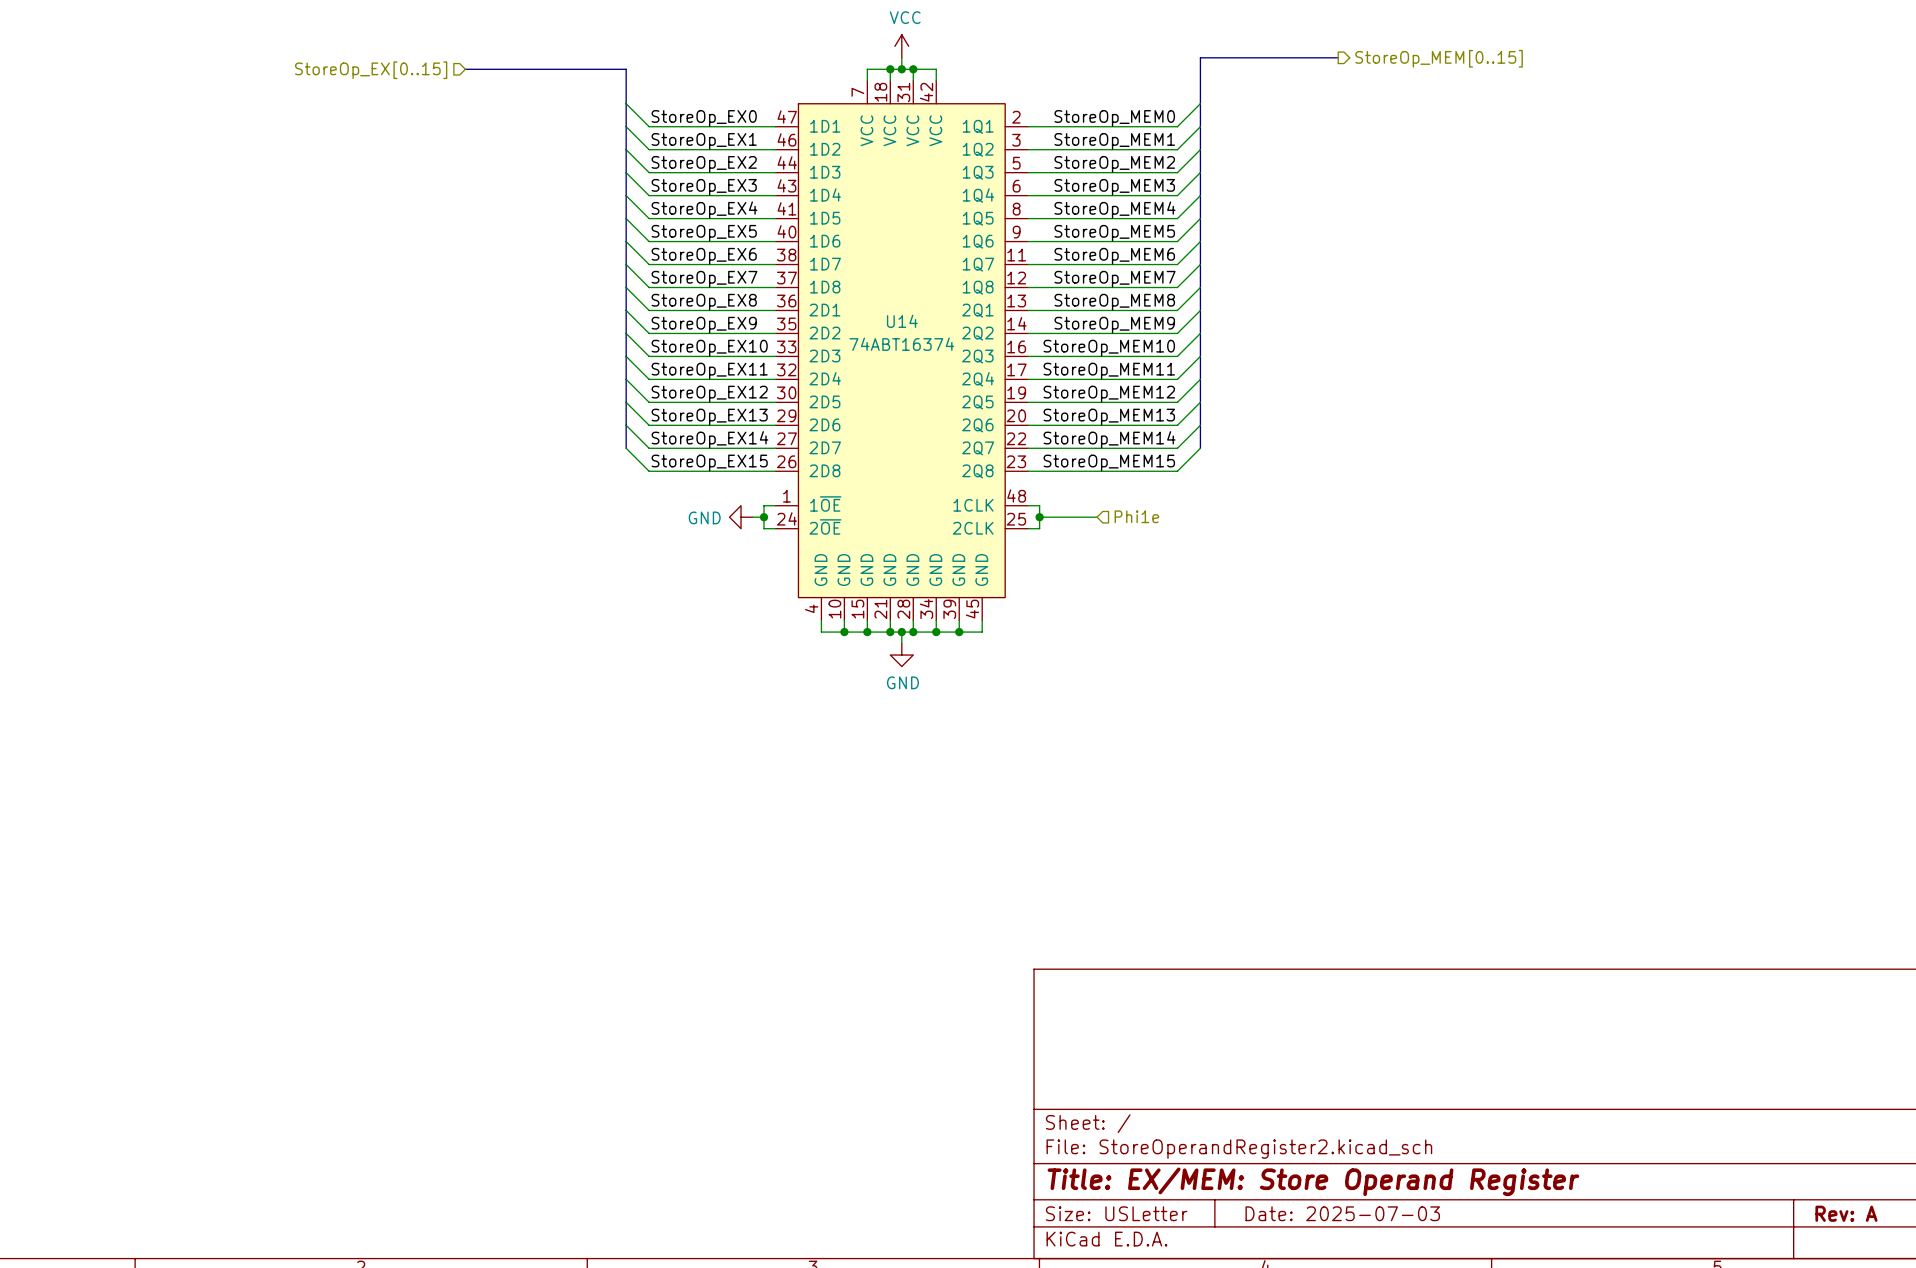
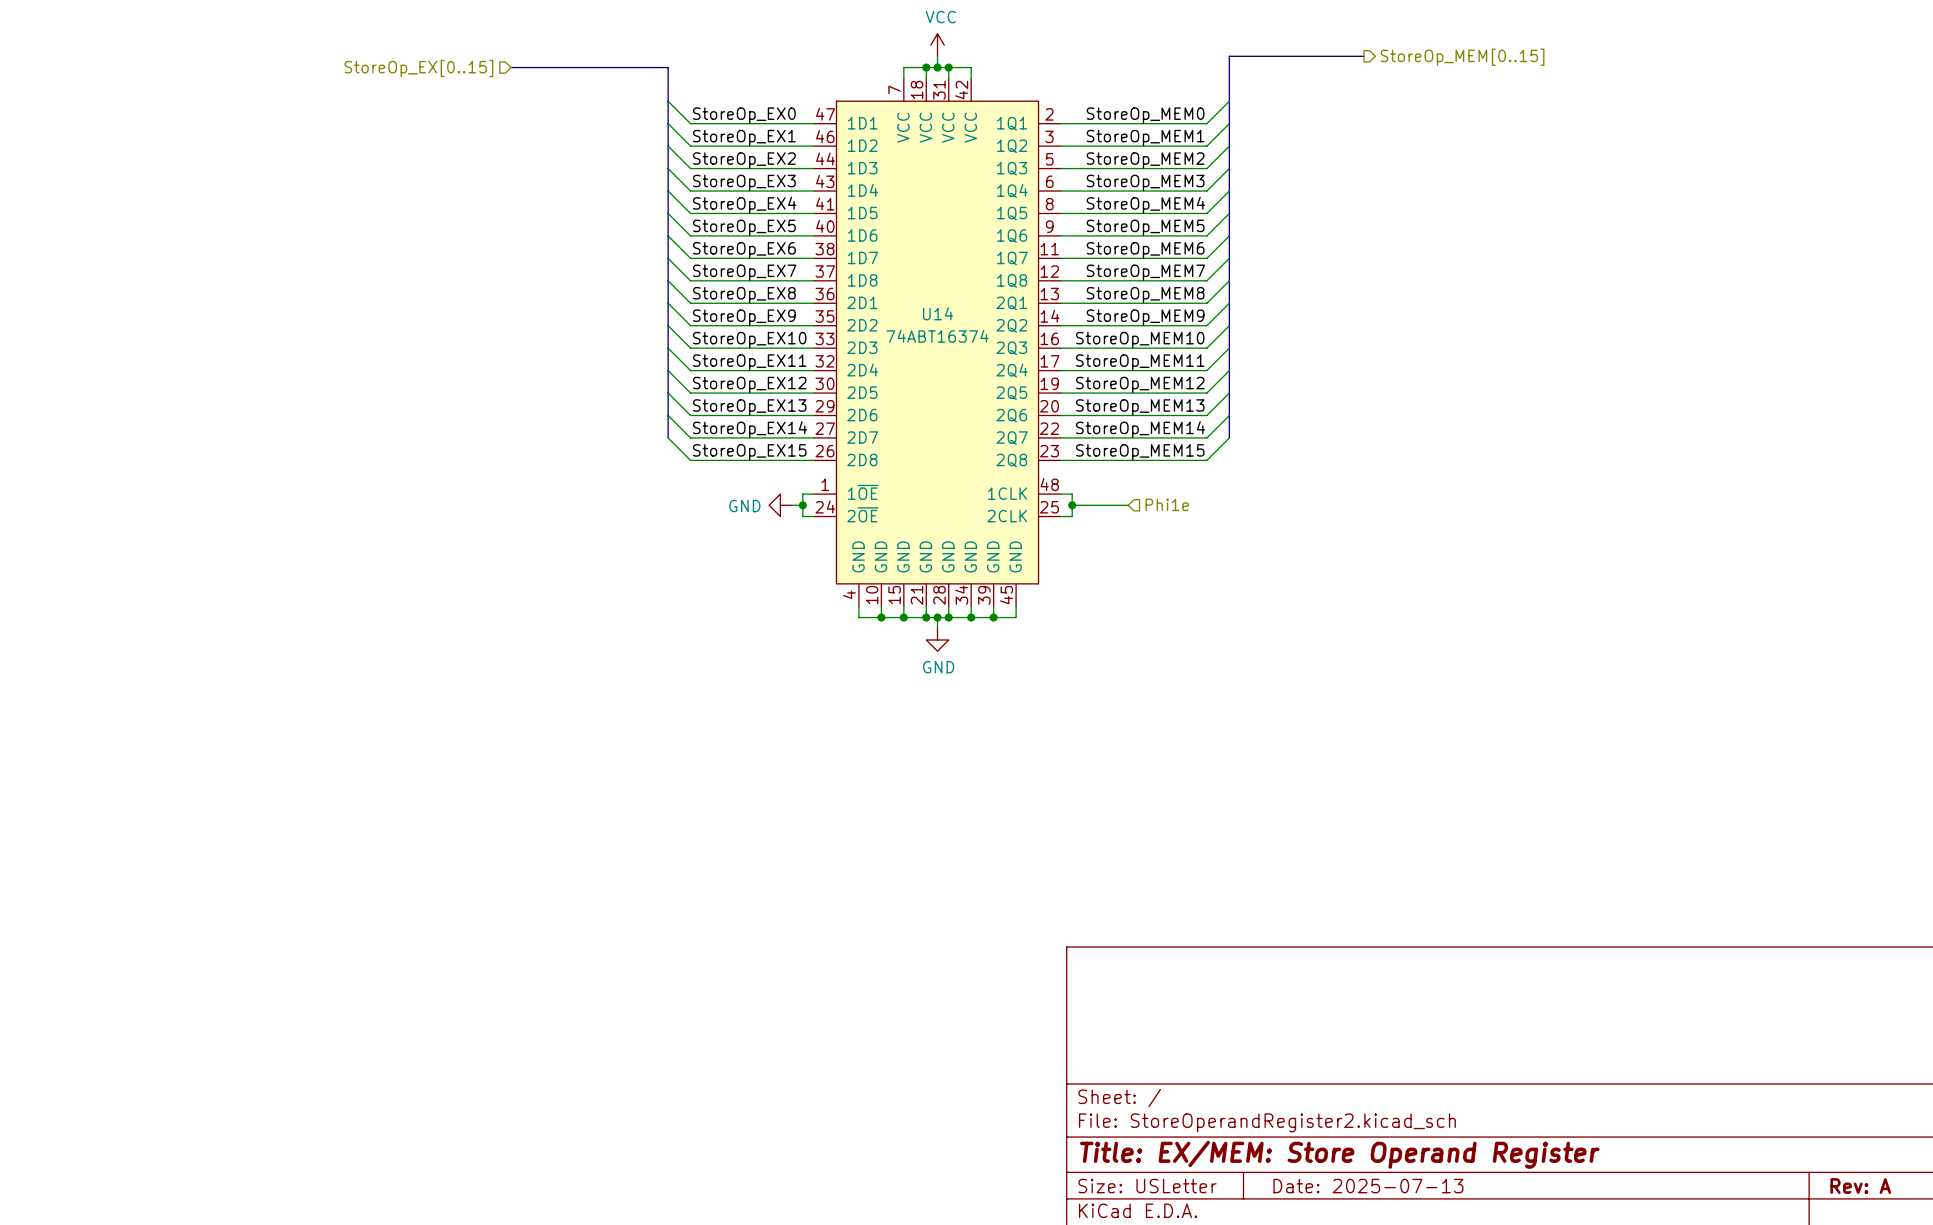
title block: Date: 2025-07-03 (1342, 1213) -> Date: 2025-07-13 (1368, 1186)

